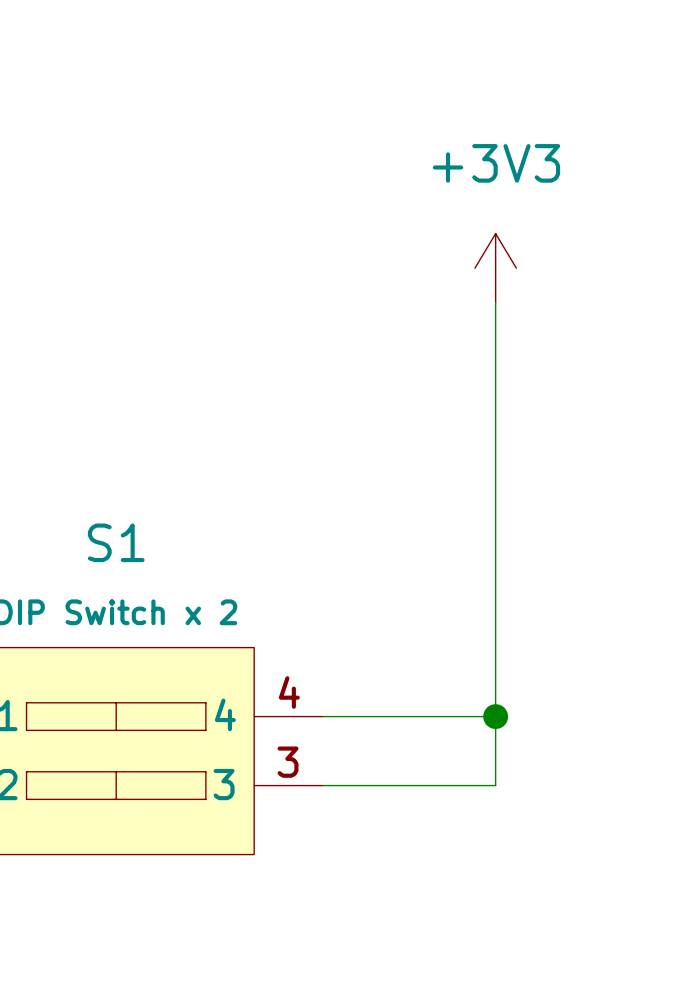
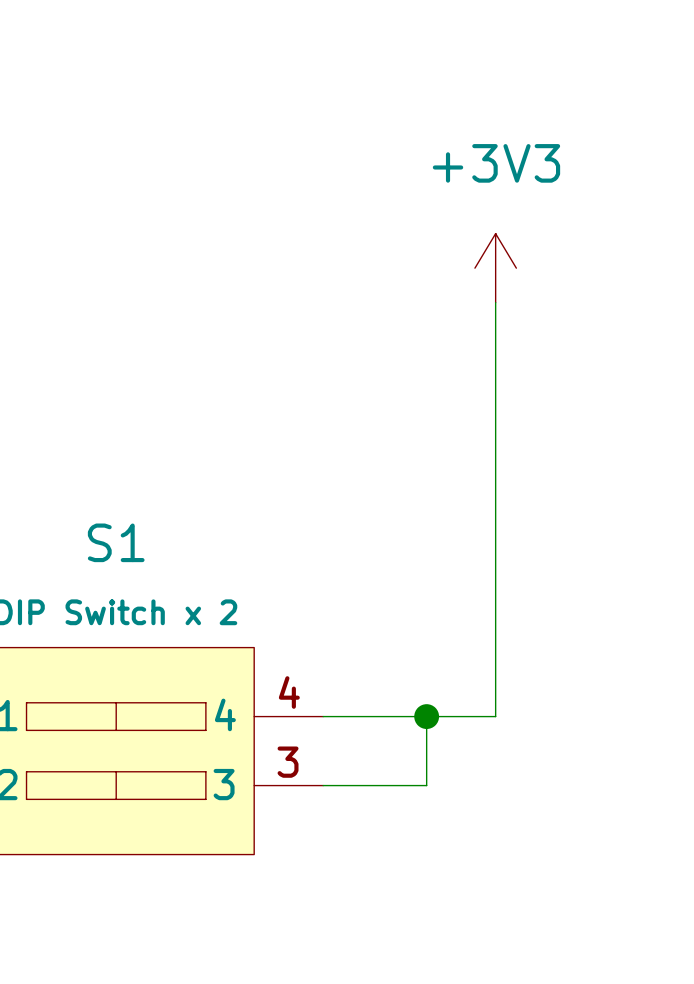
wire: (495, 716) (495, 785) (426, 785) -> (426, 716) (426, 785)
junction position: (495, 716) -> (426, 716)

